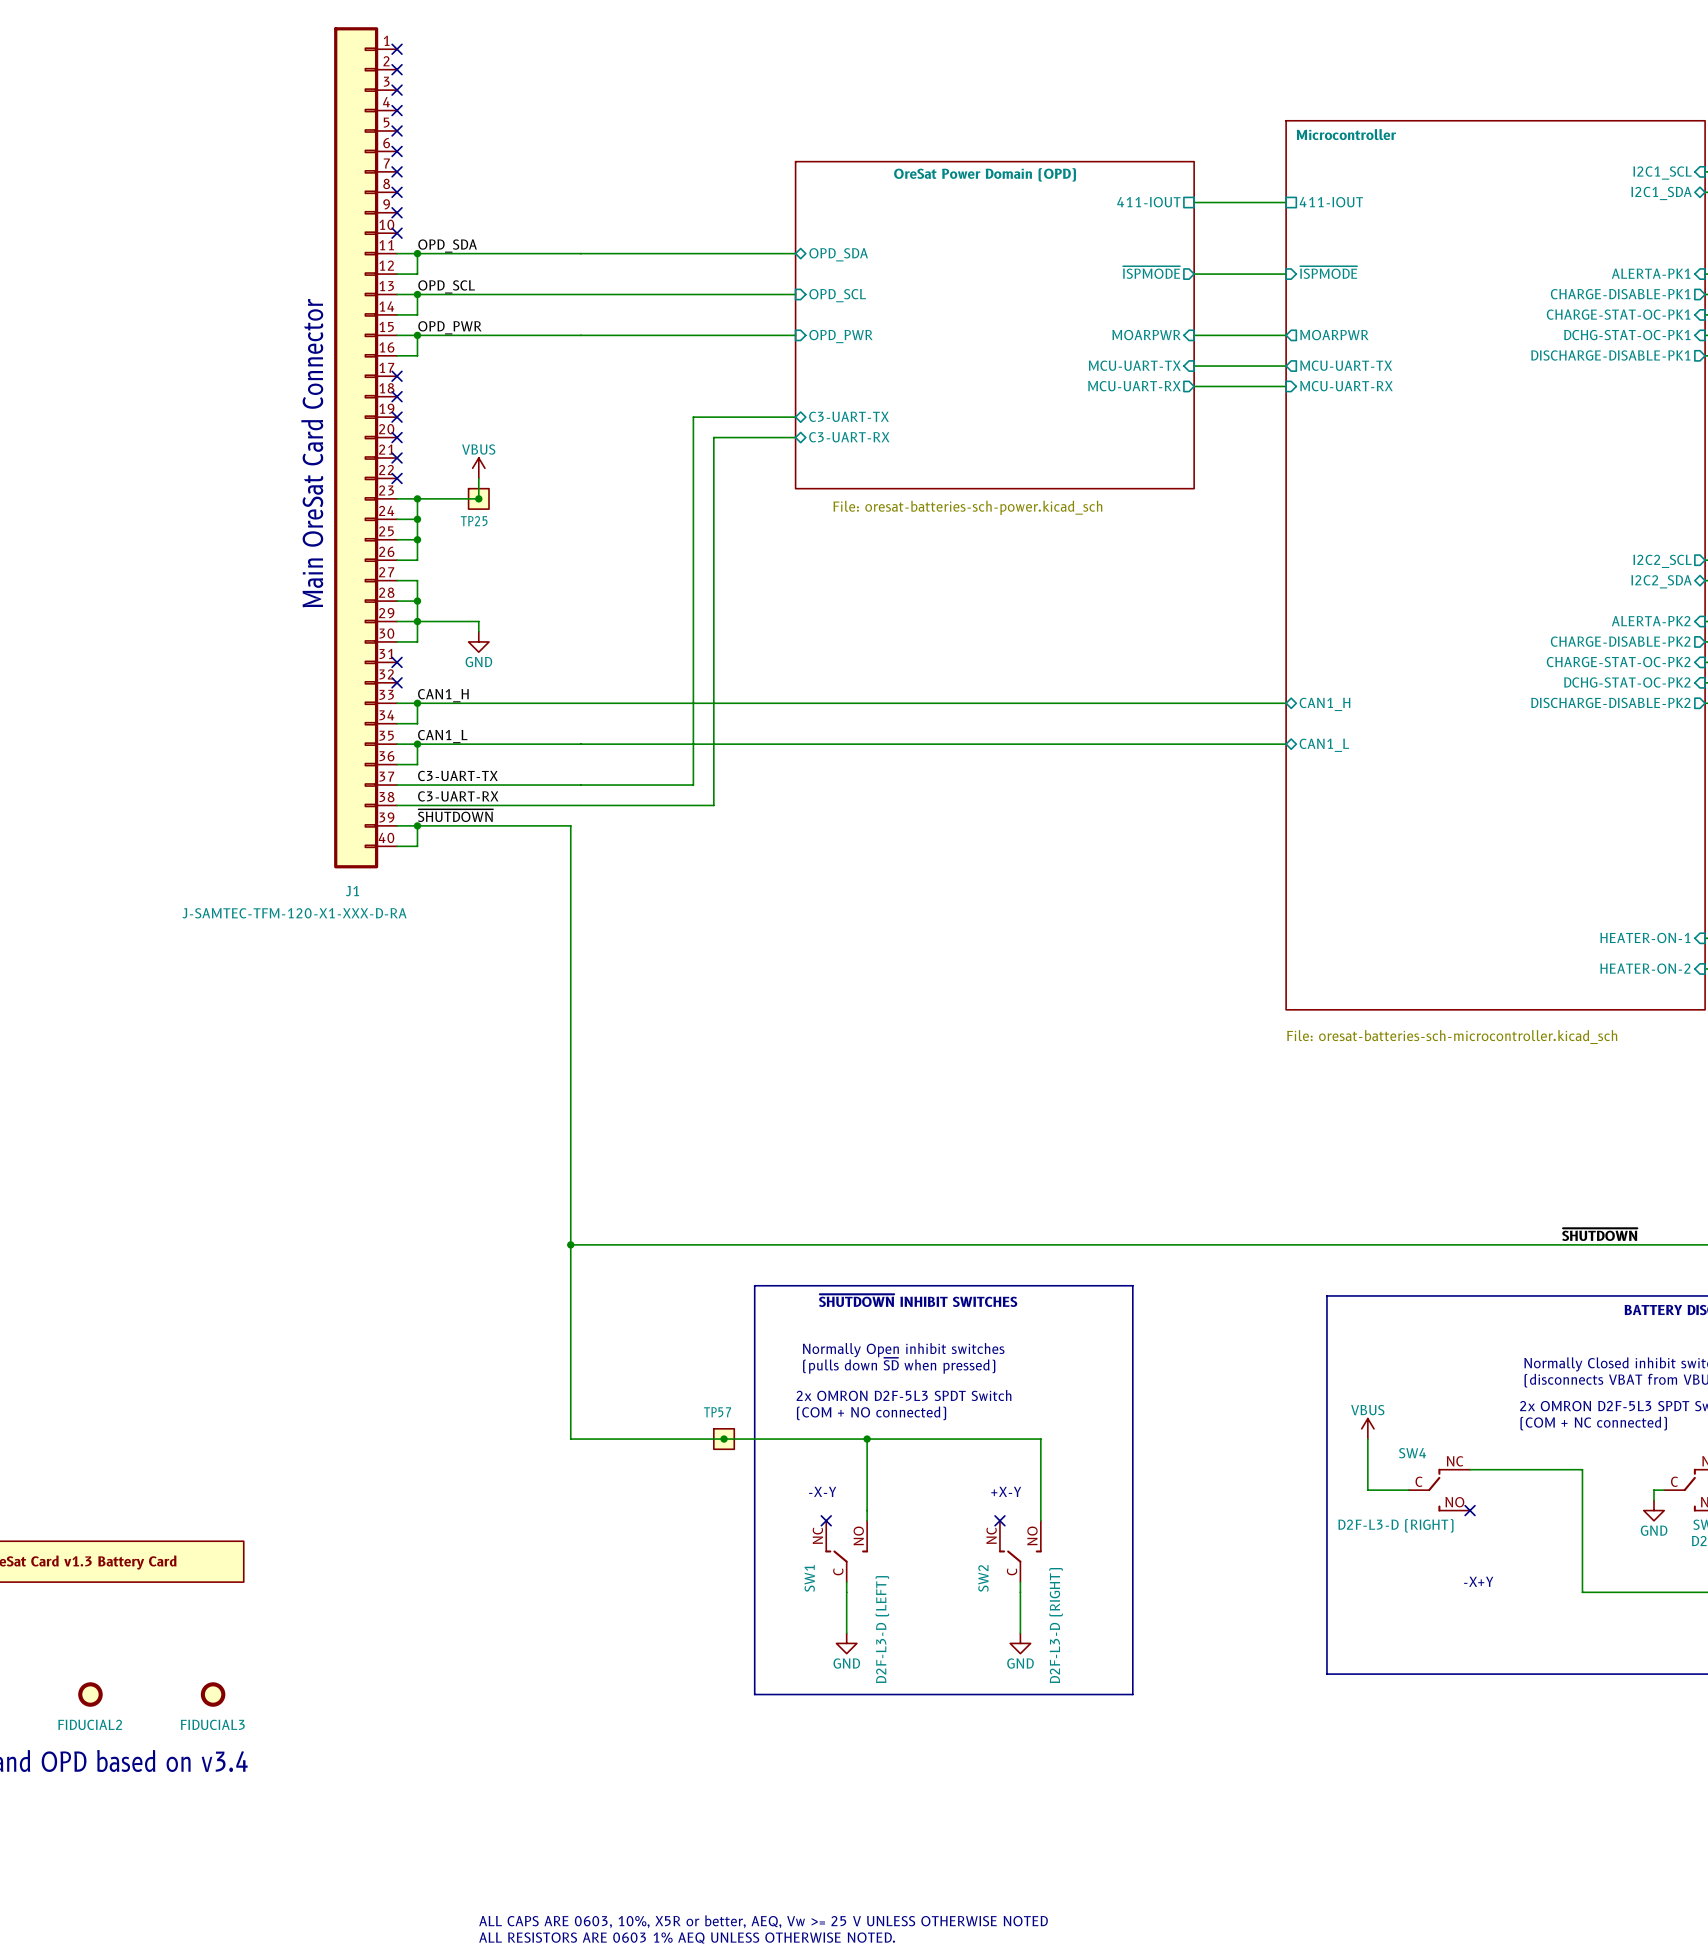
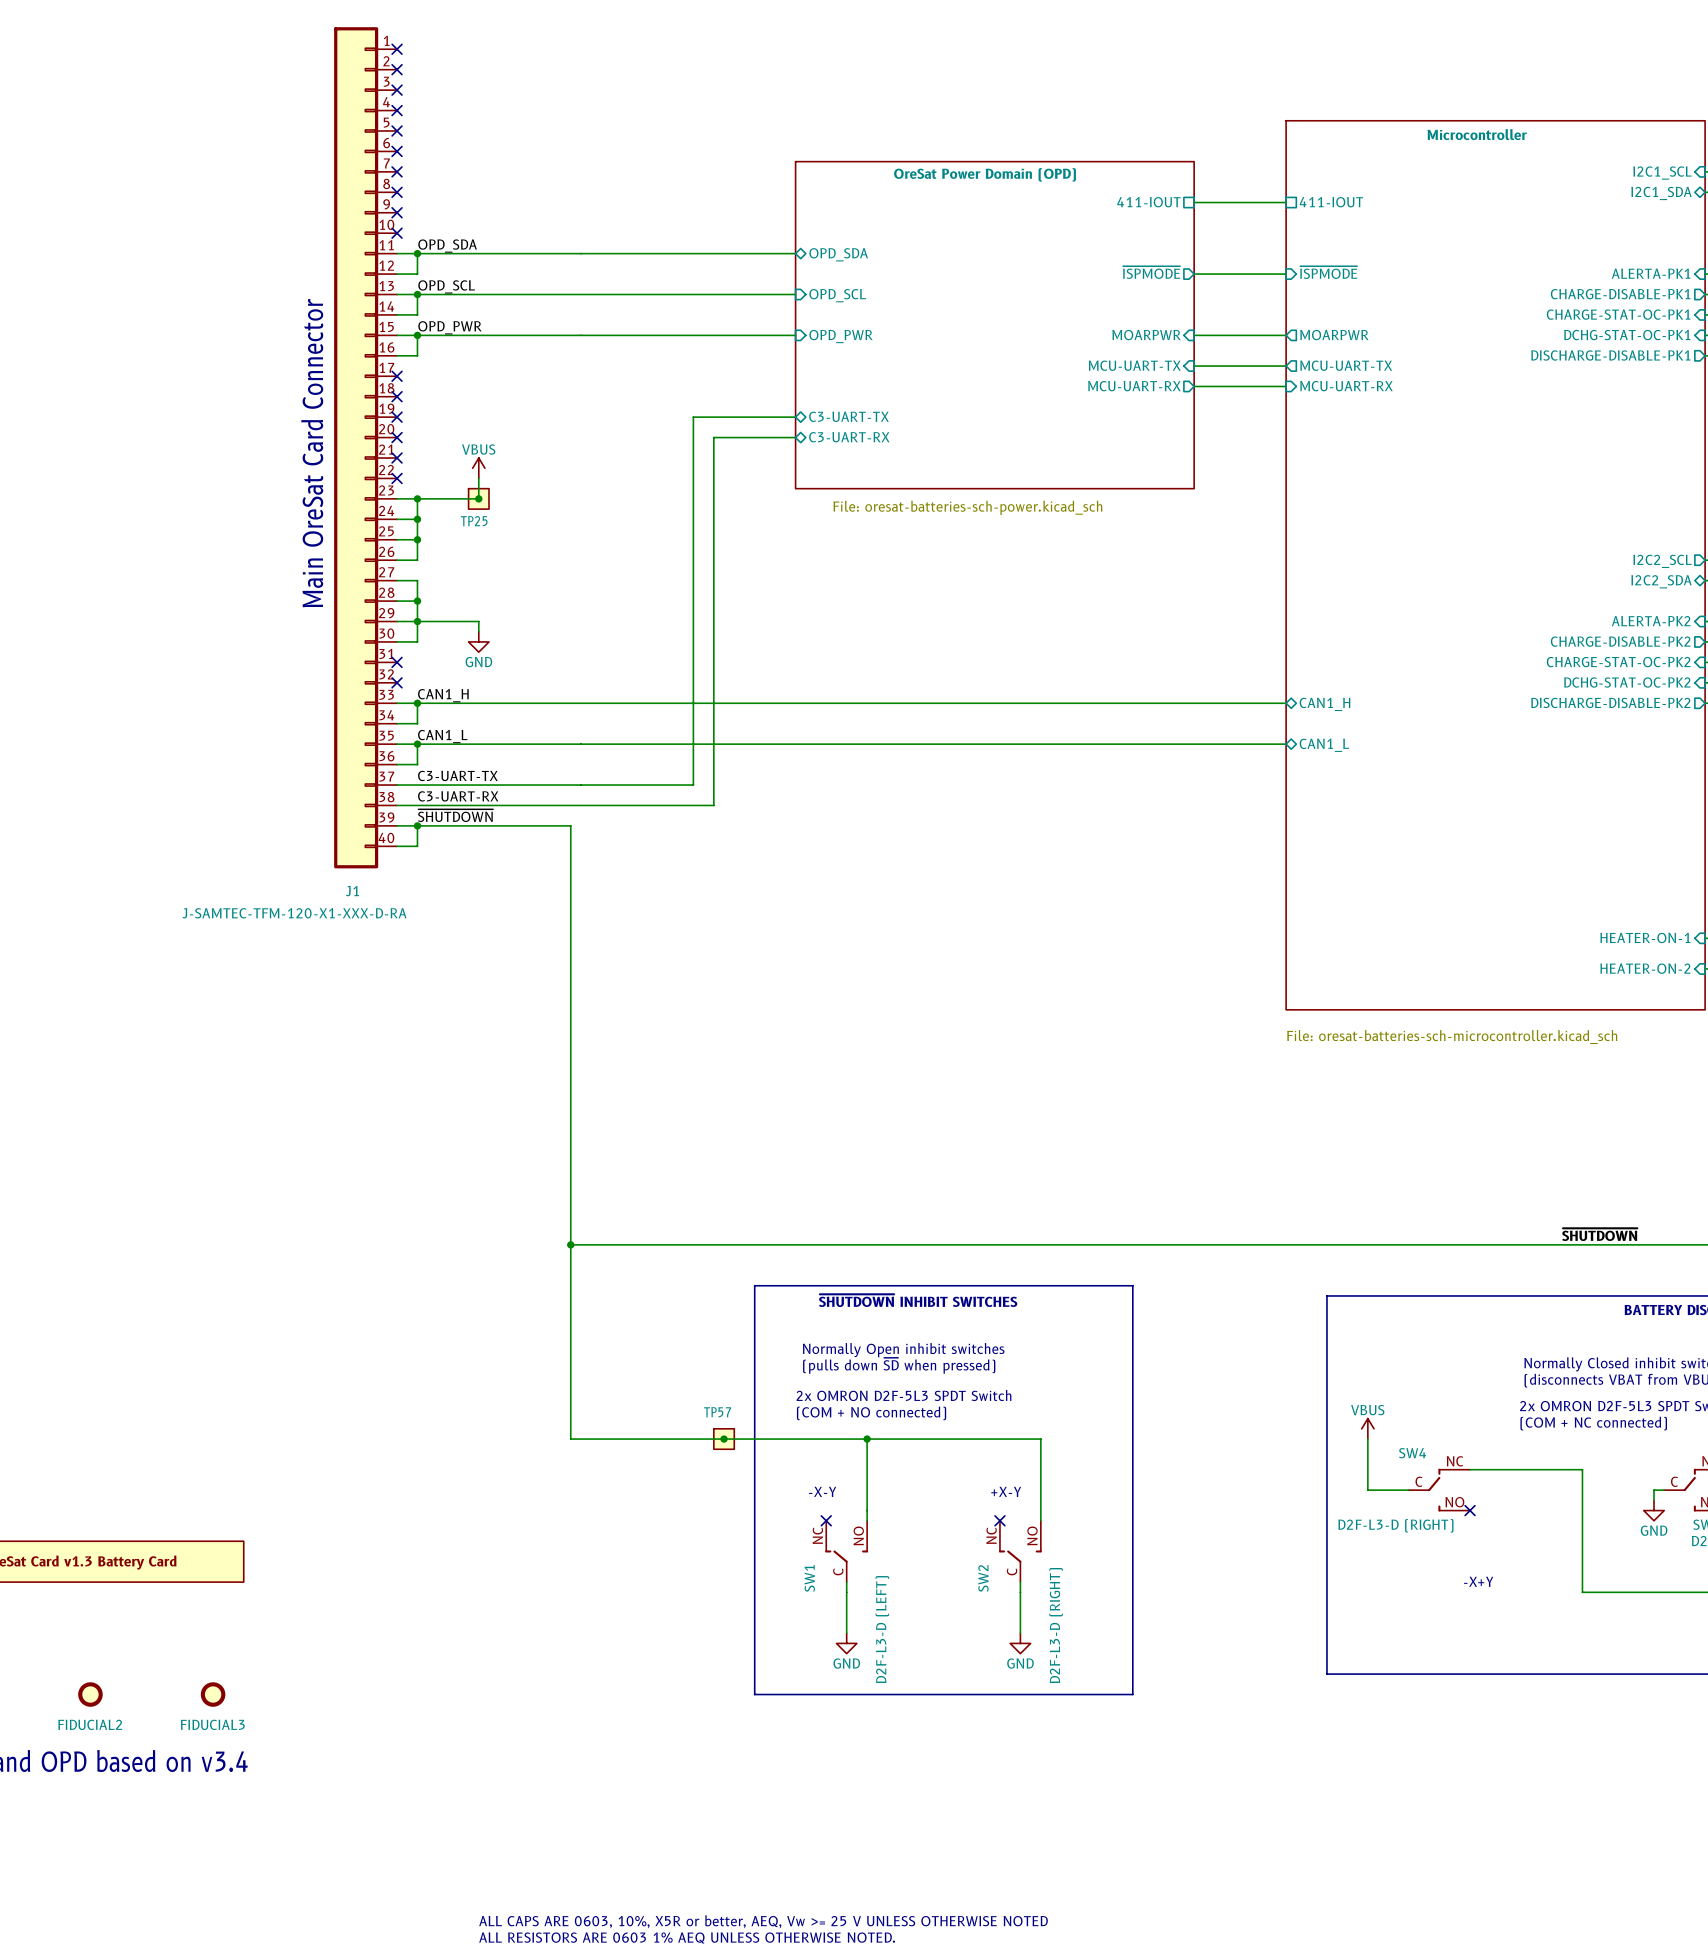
sheet Microcontroller name position: Microcontroller (1346, 134) -> Microcontroller (1477, 134)

